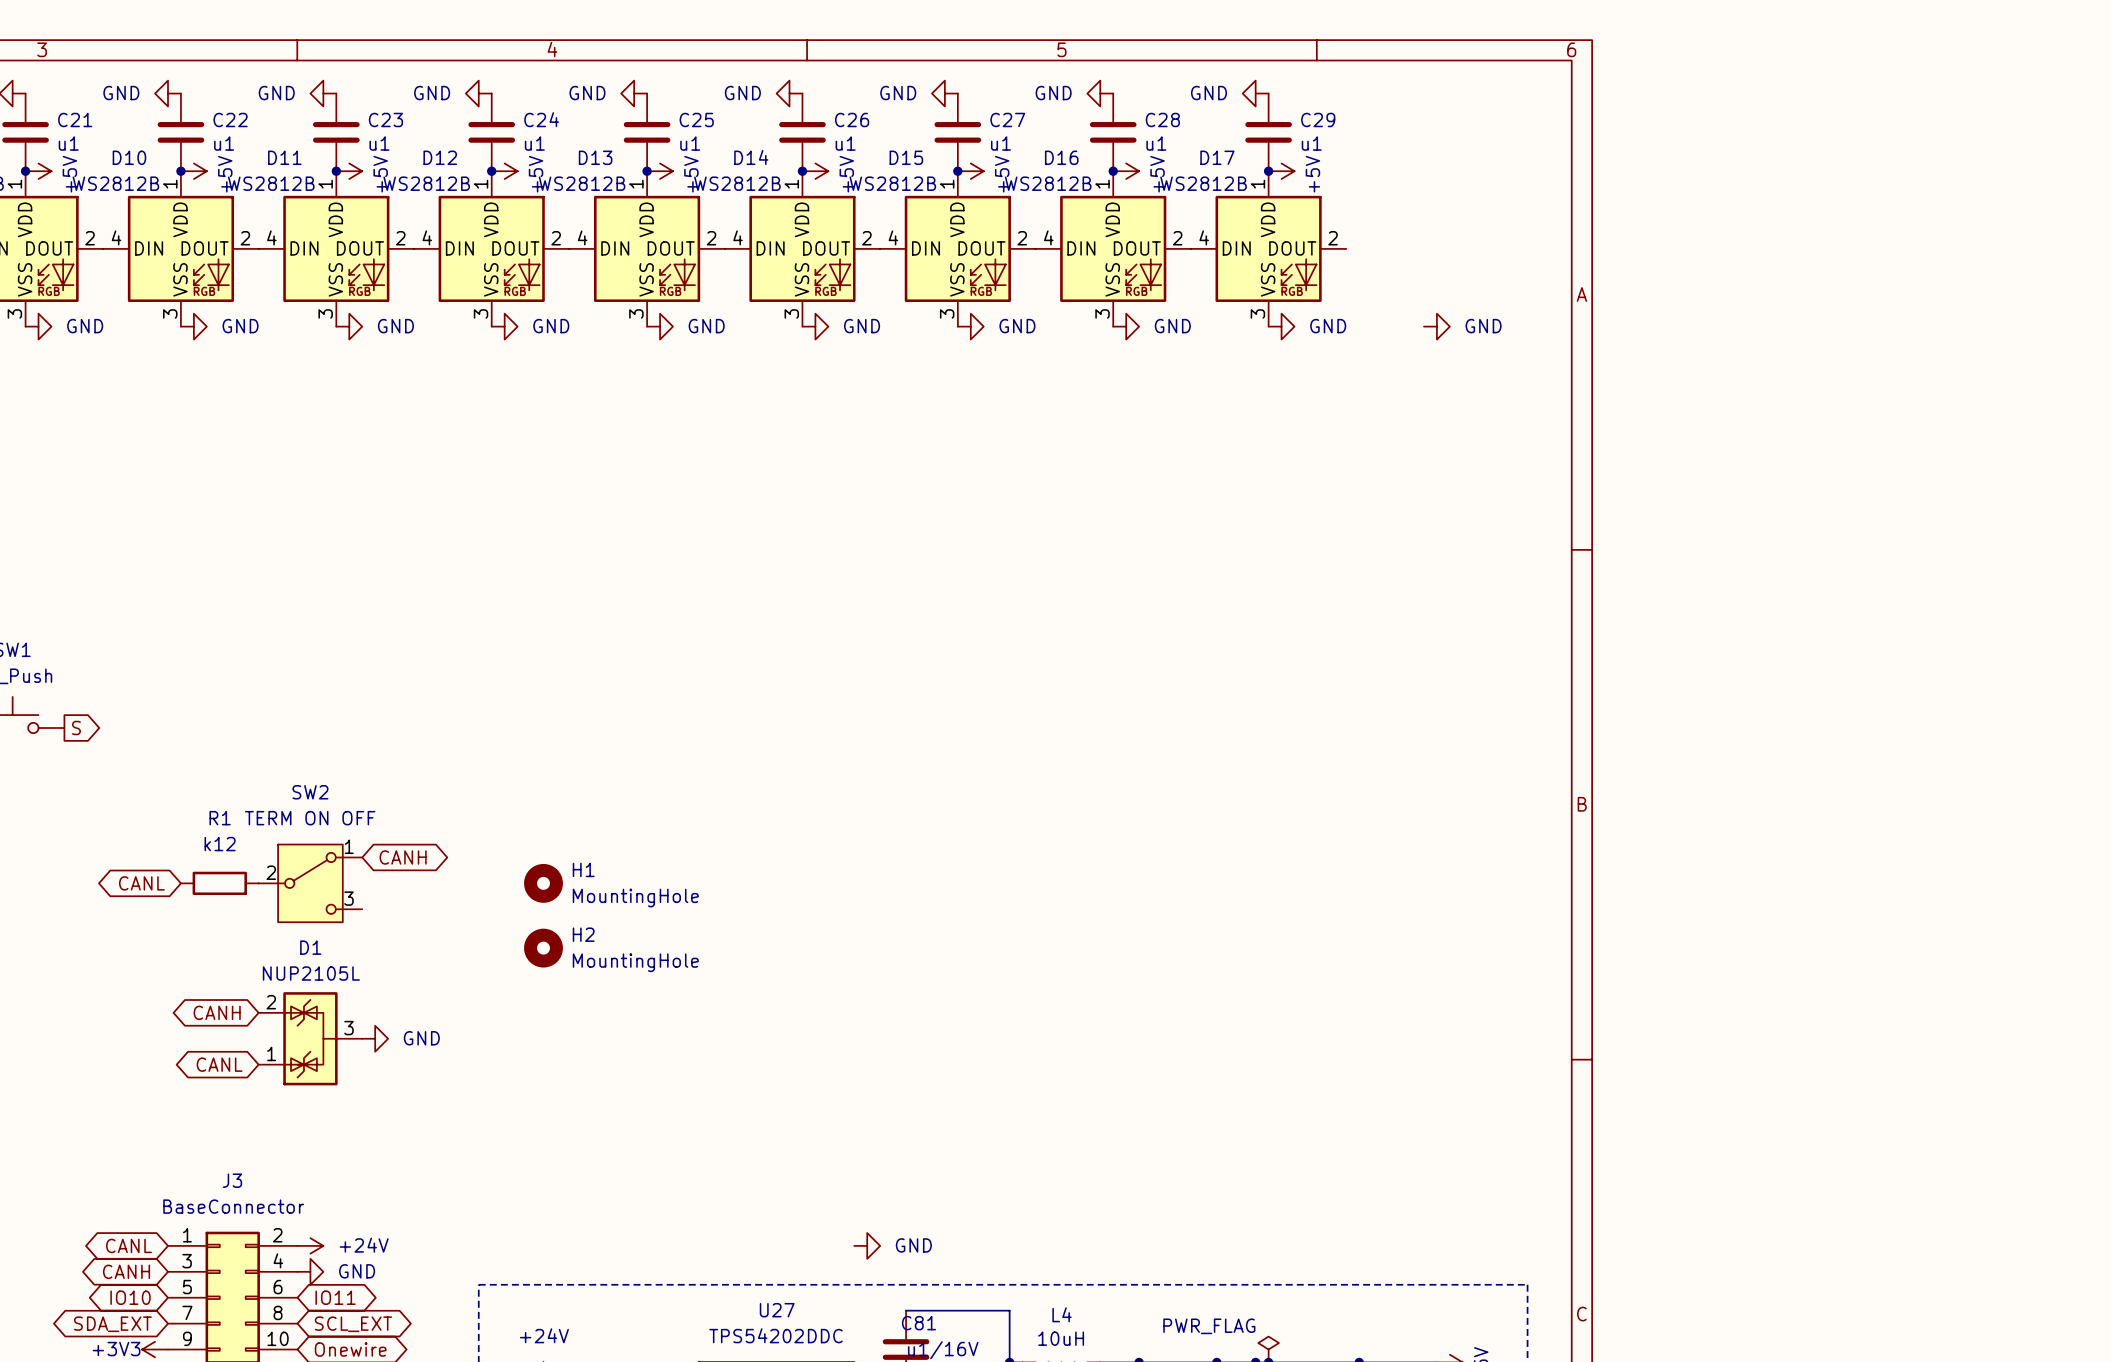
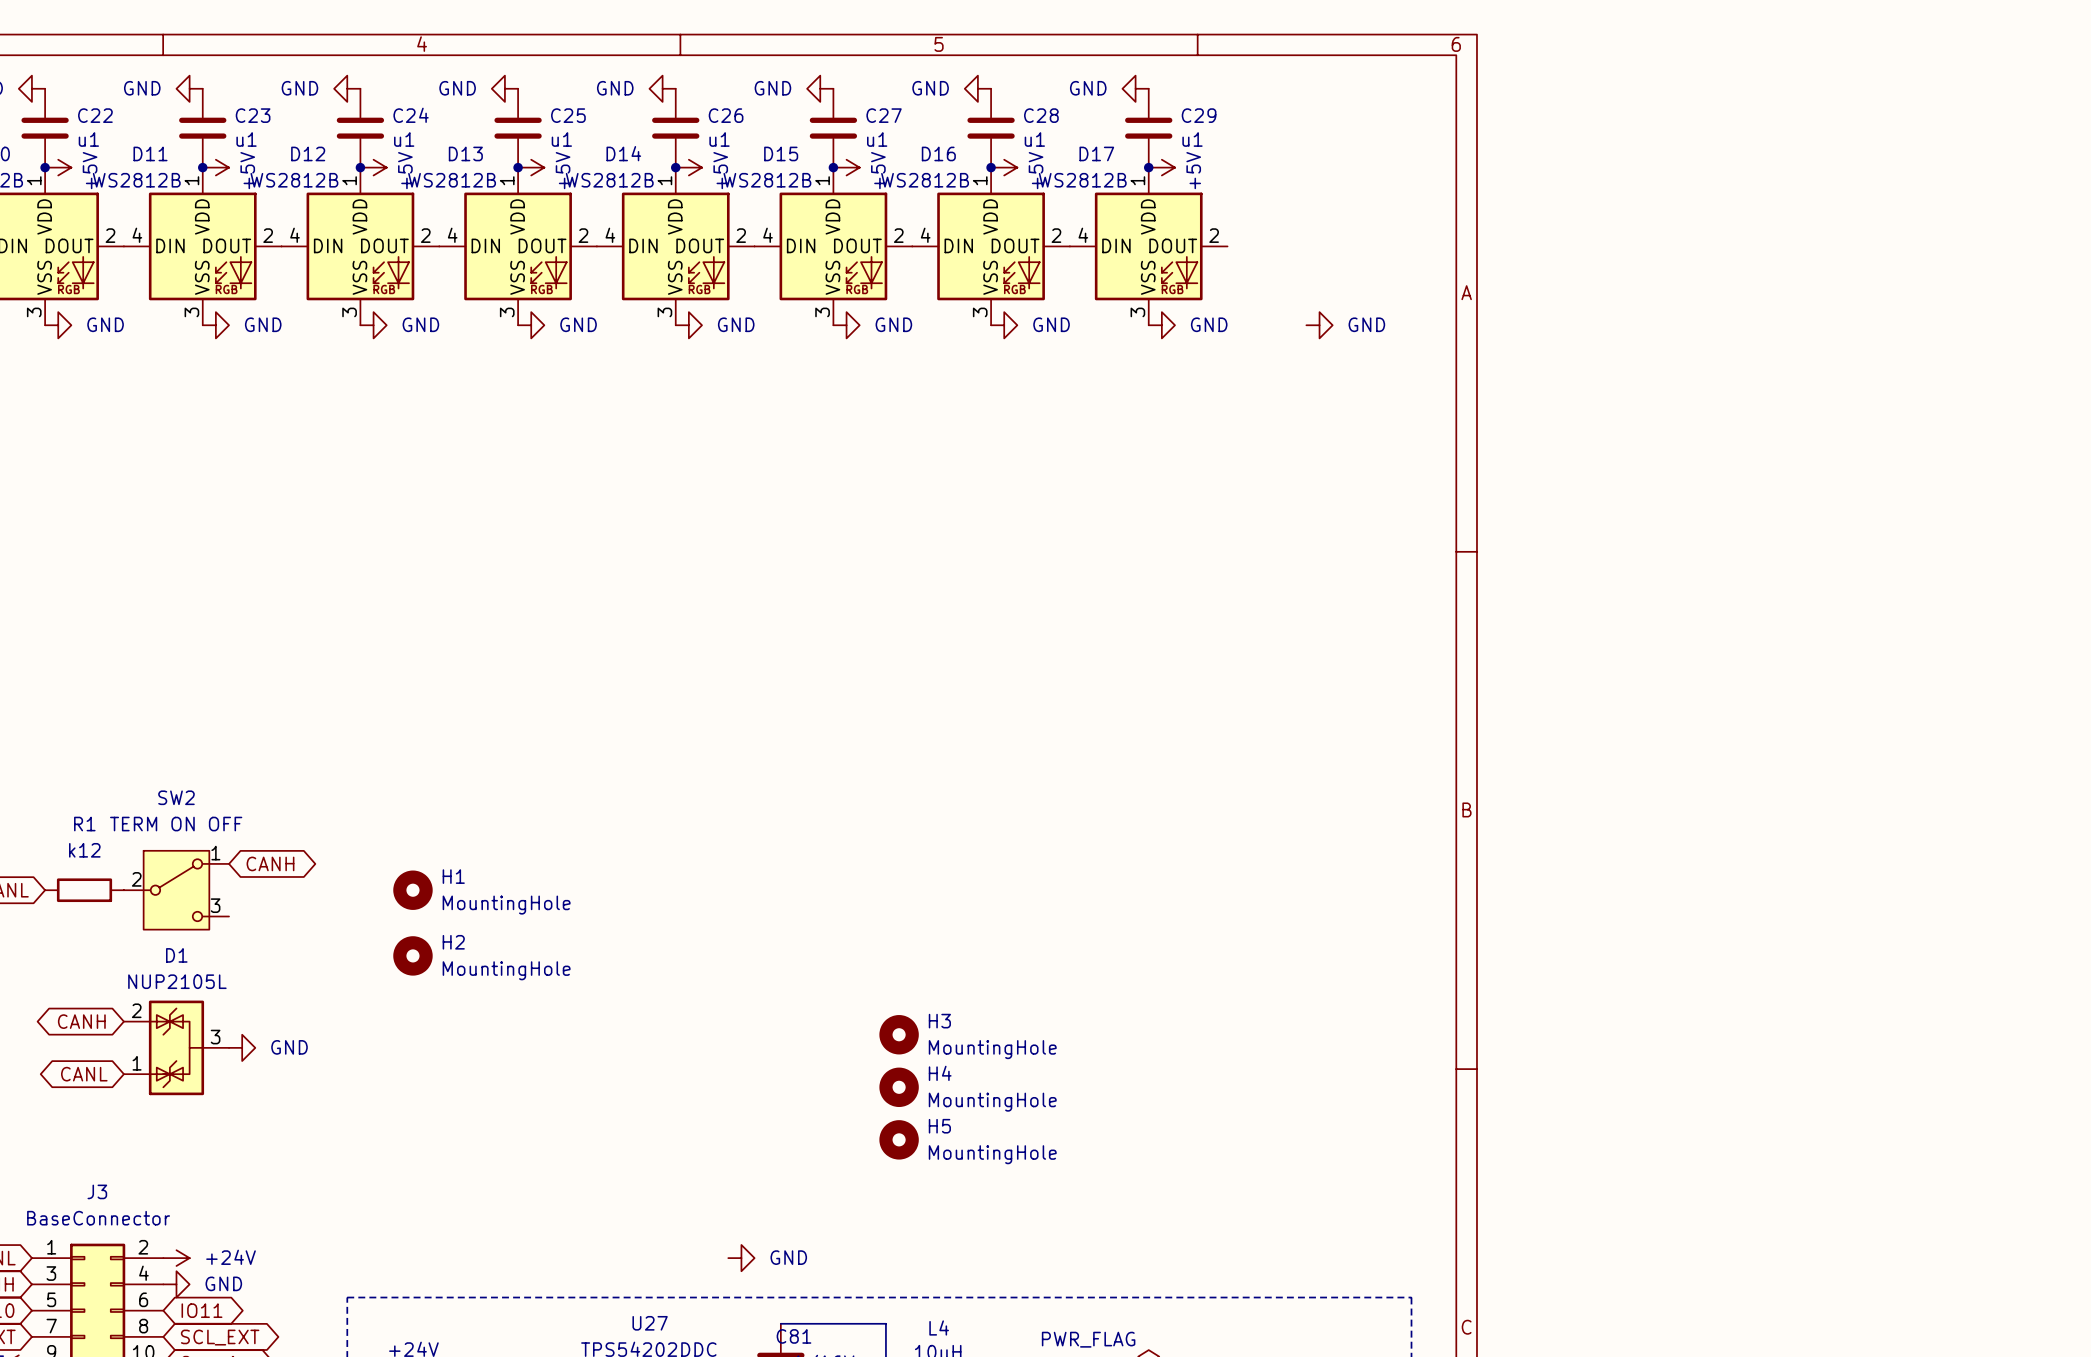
H3: none -> MountingHole (899, 1034)
H4: none -> MountingHole (899, 1087)
H5: none -> MountingHole (899, 1139)

